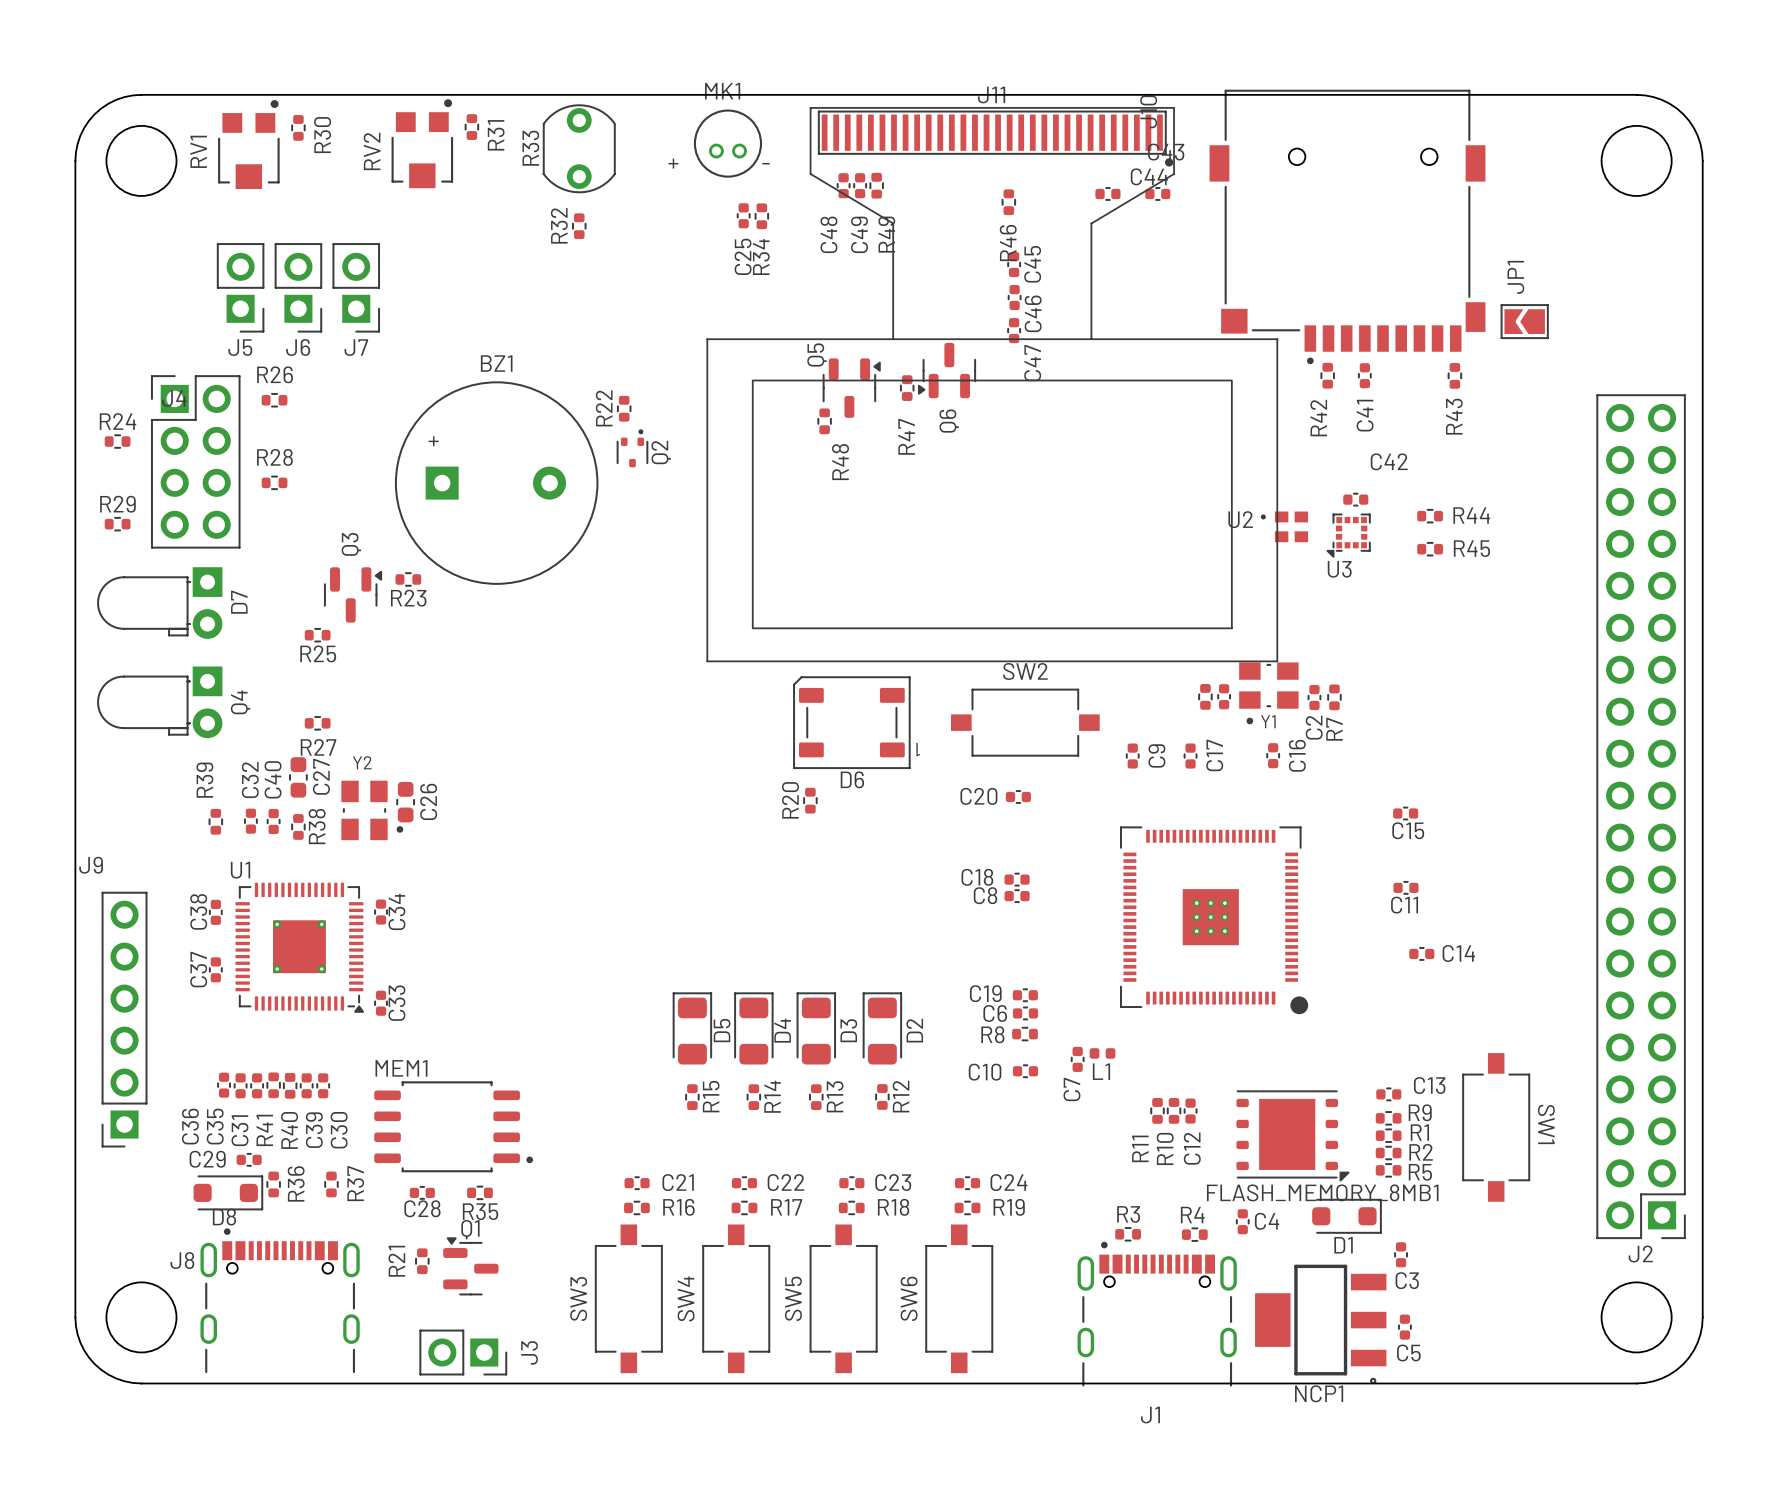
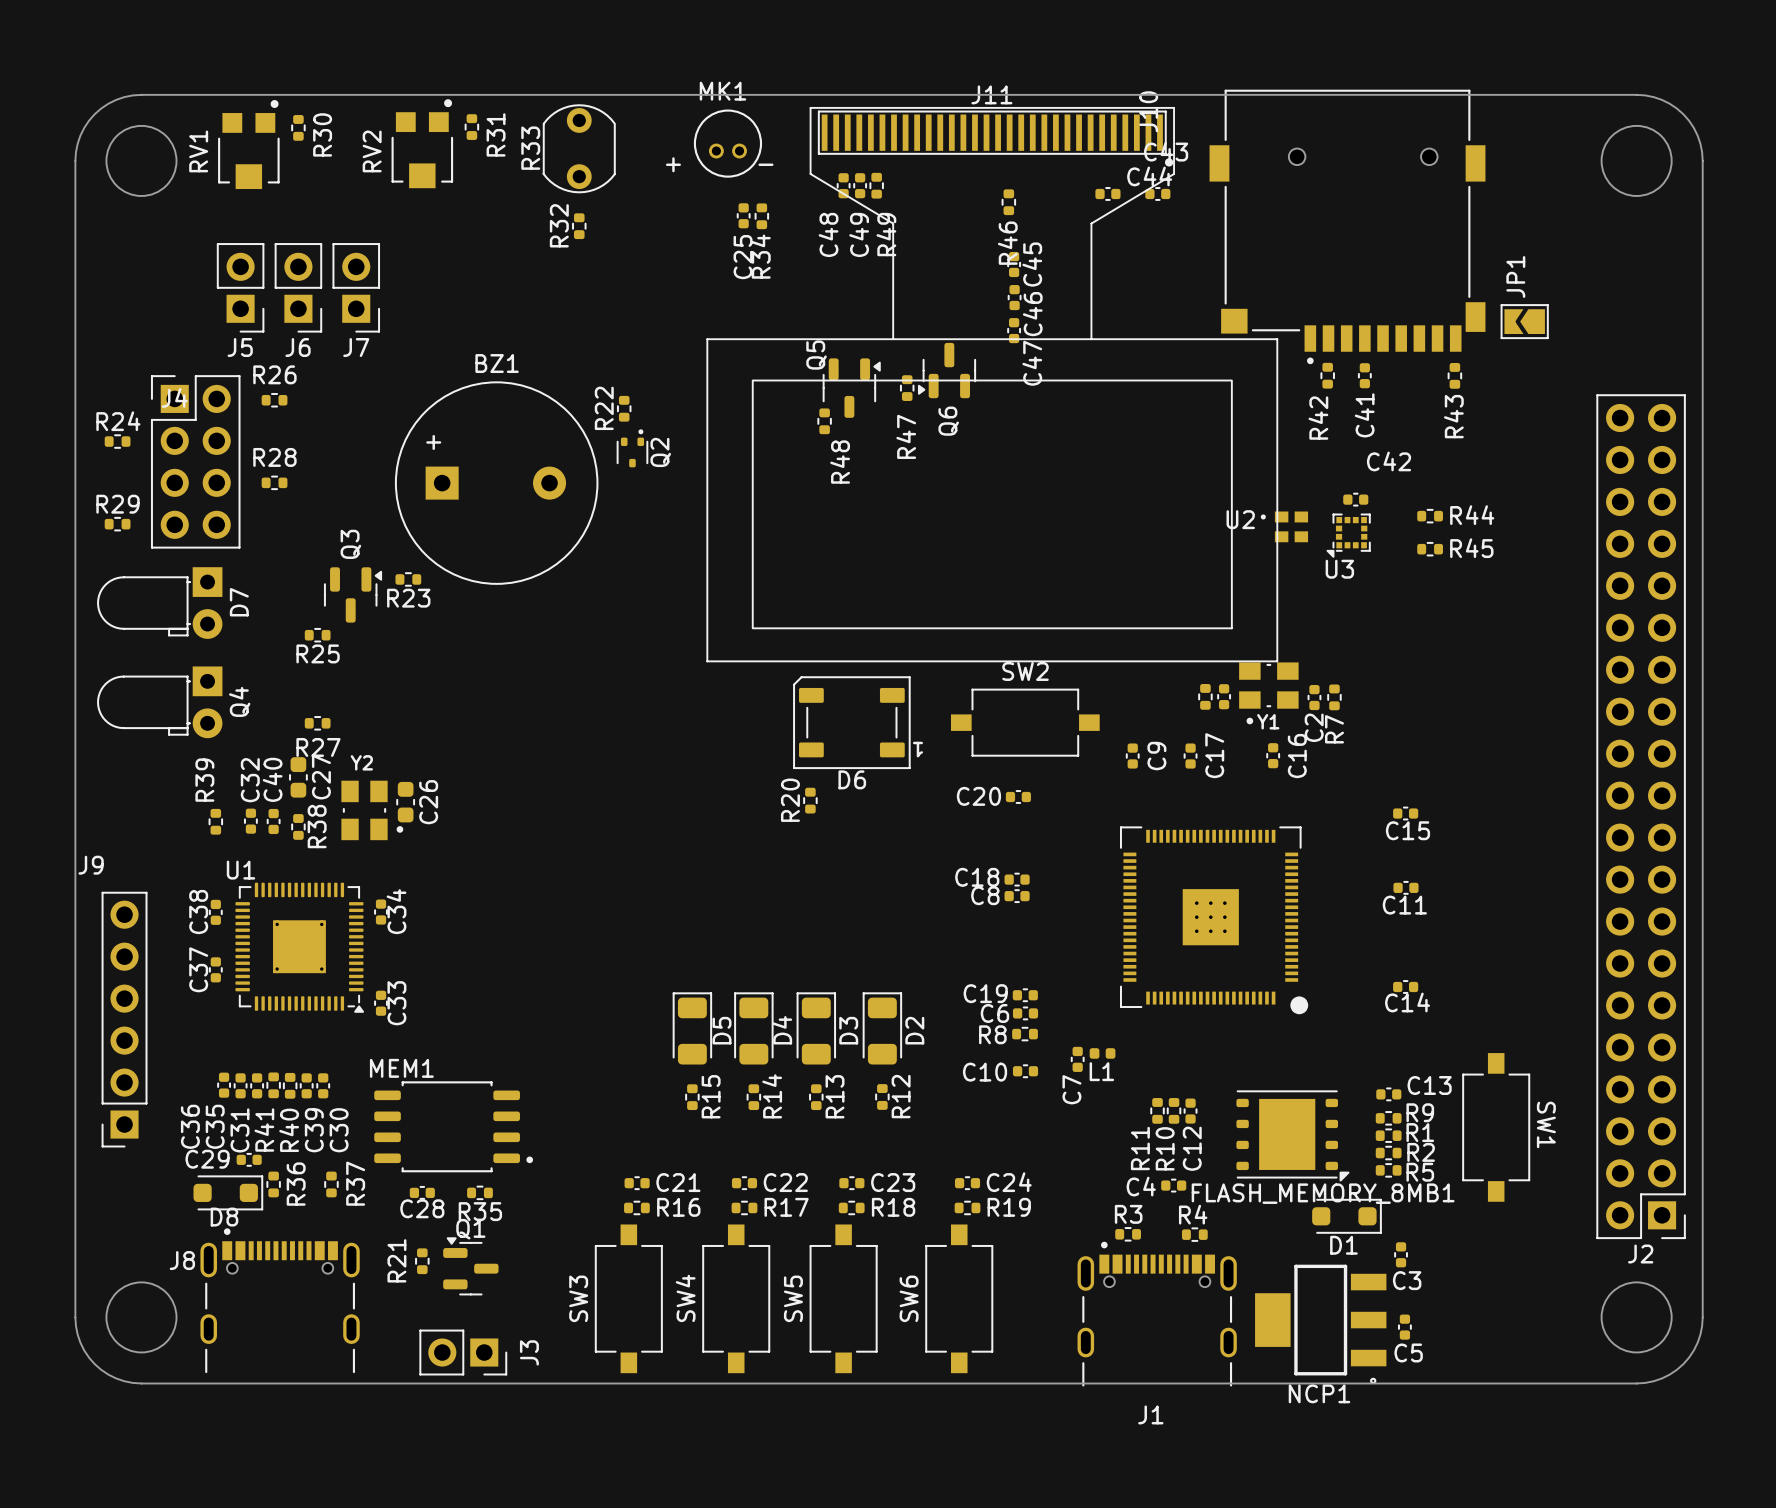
C14 position: (1421, 953) -> (1405, 986)
C14 name position: C14 (1458, 953) -> C14 (1407, 1002)
C4 rotation: 0° (1242, 1221) -> 90° clockwise (1173, 1185)
C4 position: (1242, 1221) -> (1173, 1185)
C4 name position: C4 (1267, 1221) -> C4 (1141, 1186)

